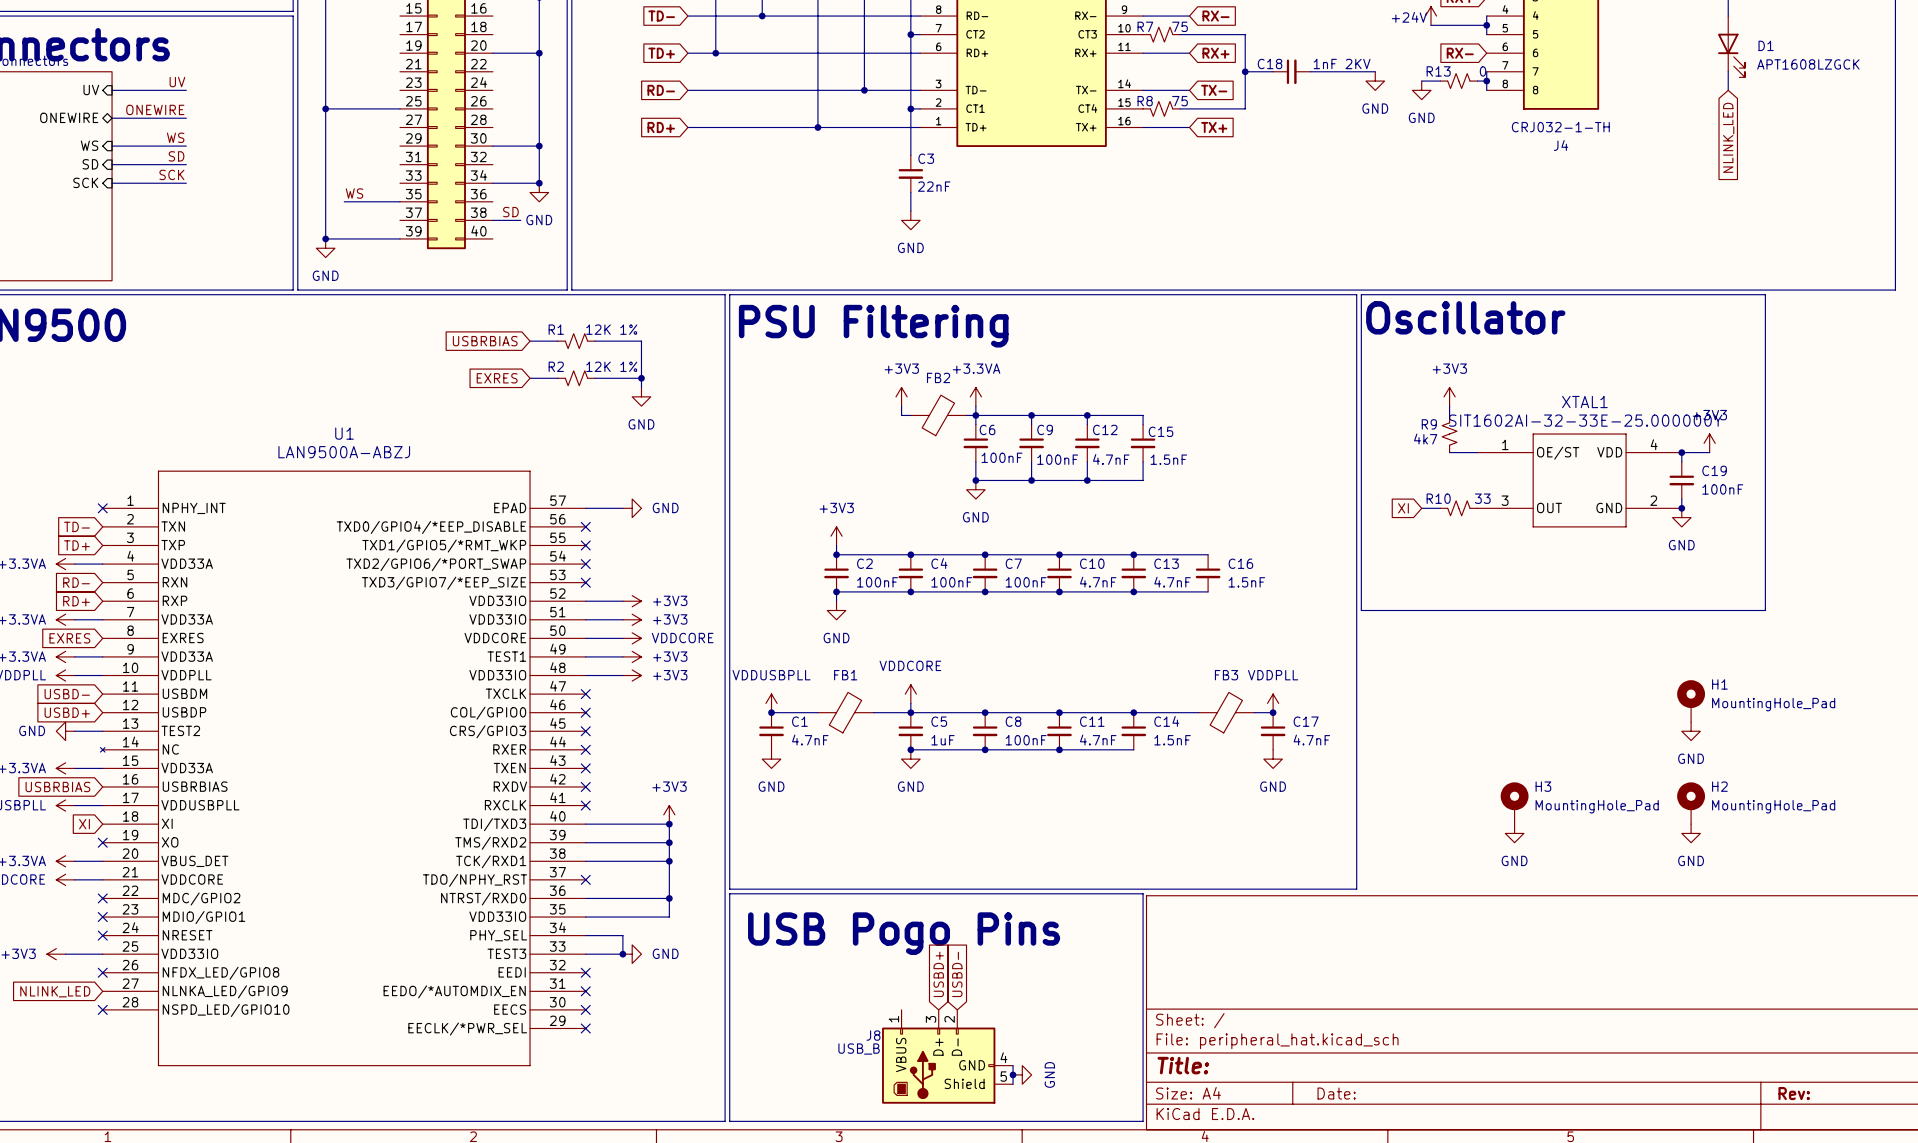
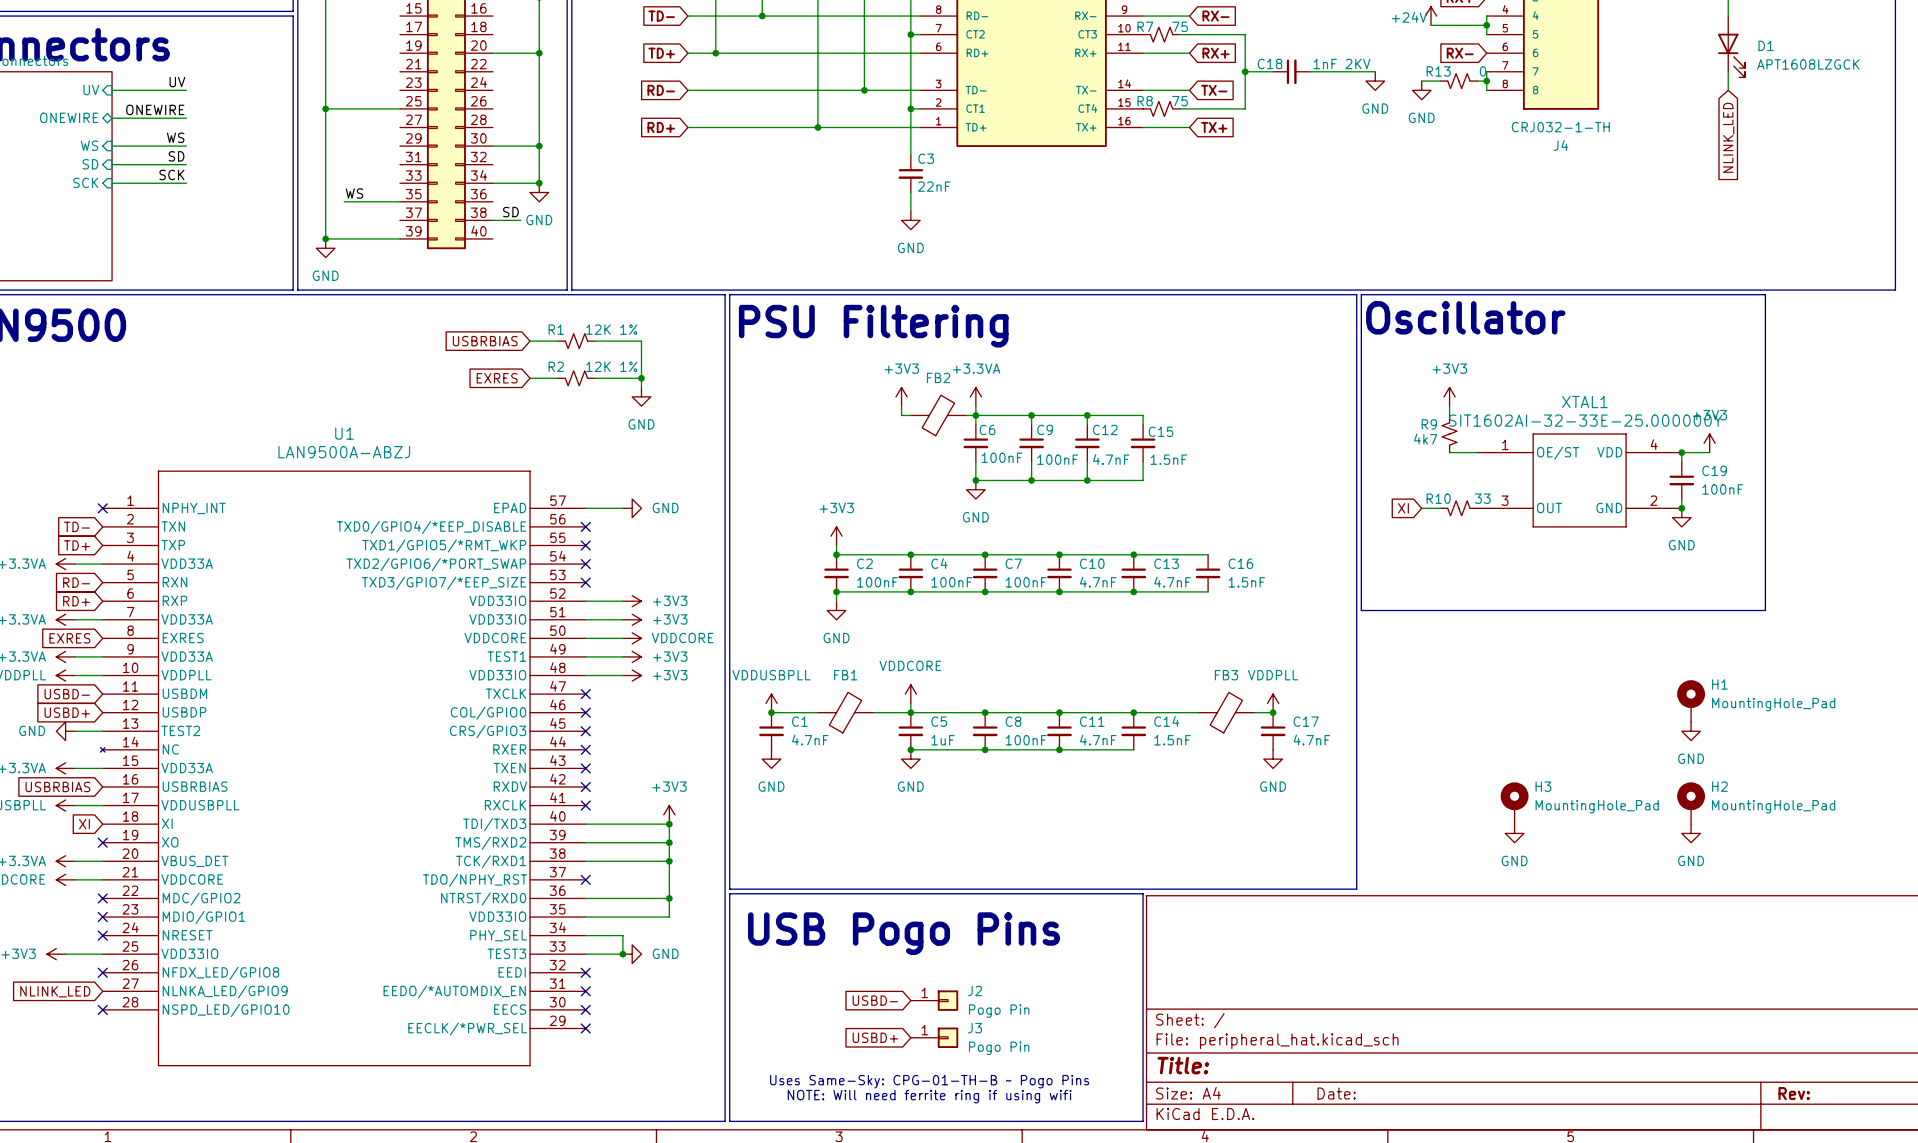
global label rotation: 0° (938, 974) -> 90° counterclockwise (875, 1037)
global label position: USBD+ (938, 974) -> USBD+ (875, 1037)
global label rotation: 0° (957, 974) -> 90° counterclockwise (875, 1000)
global label position: USBD- (957, 974) -> USBD- (875, 1000)
J2: none -> Pogo Pin (934, 1000)
J3: none -> Pogo Pin (934, 1037)
J8: USB_B (947, 1056) -> none
wire: (1013, 1065) (1013, 1084) -> none
junction: (1013, 1074) -> none
power symbol: GND (1022, 1074) -> none
text: none -> Uses Same-Sky: CPG-01-TH-B ~ Pogo Pins (929, 1081)
text: none -> NOTE: Will need ferrite ring if using wifi (929, 1096)

